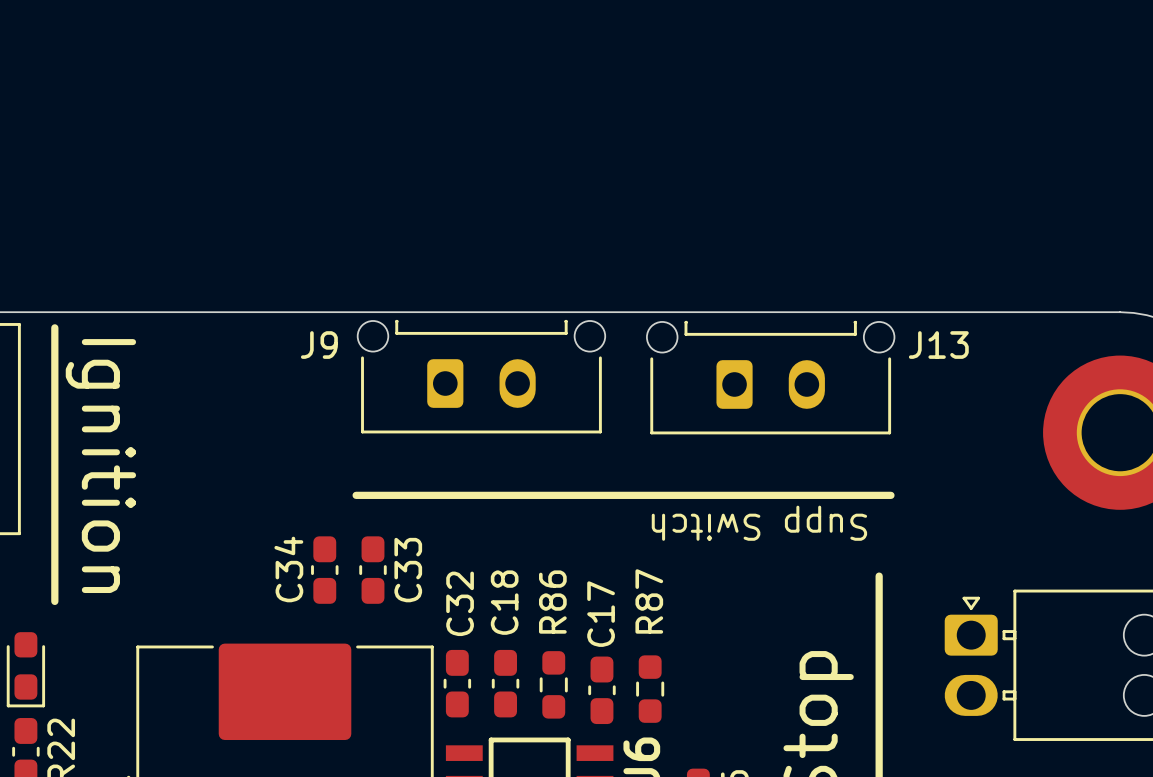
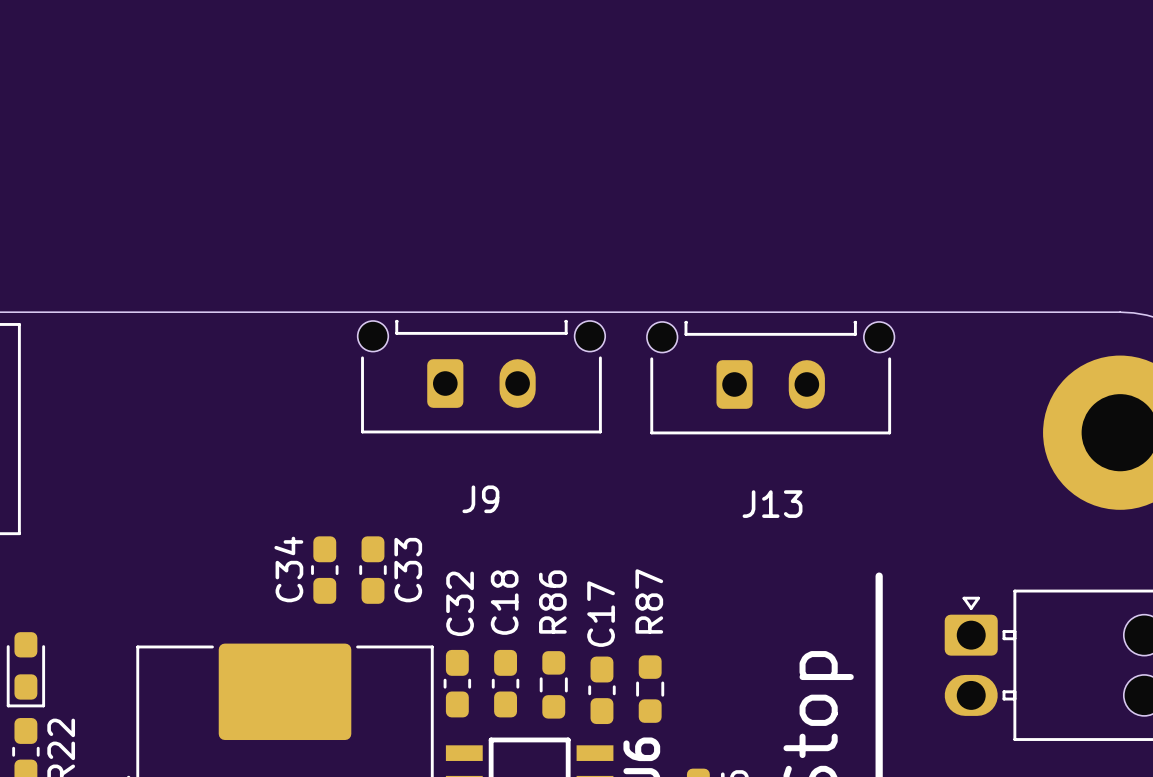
line: (54, 327) (54, 601) -> none
J9 name position: J9 (319, 345) -> J9 (480, 499)
J13 name position: J13 (938, 345) -> J13 (772, 504)
text: Ignition (100, 466) -> none
line: (356, 495) (890, 495) -> none
text: Supp Switch (759, 523) -> none

